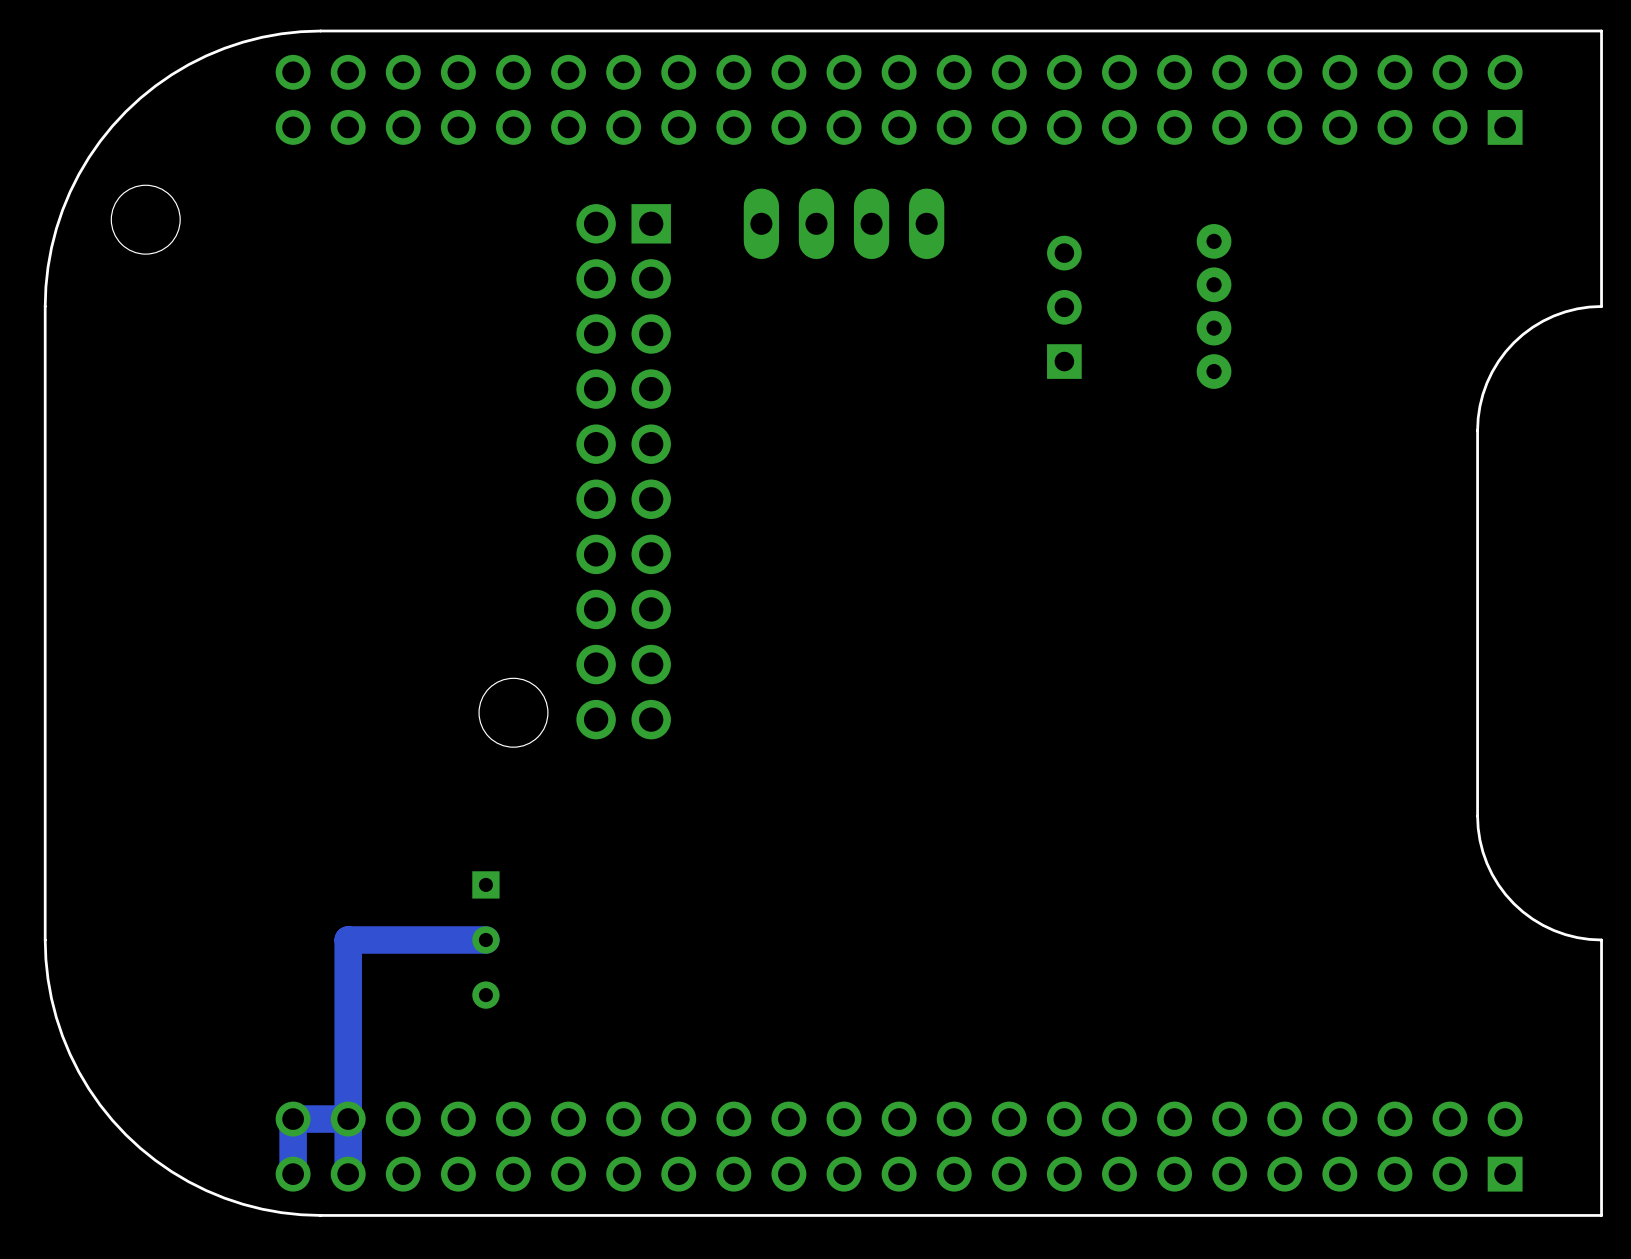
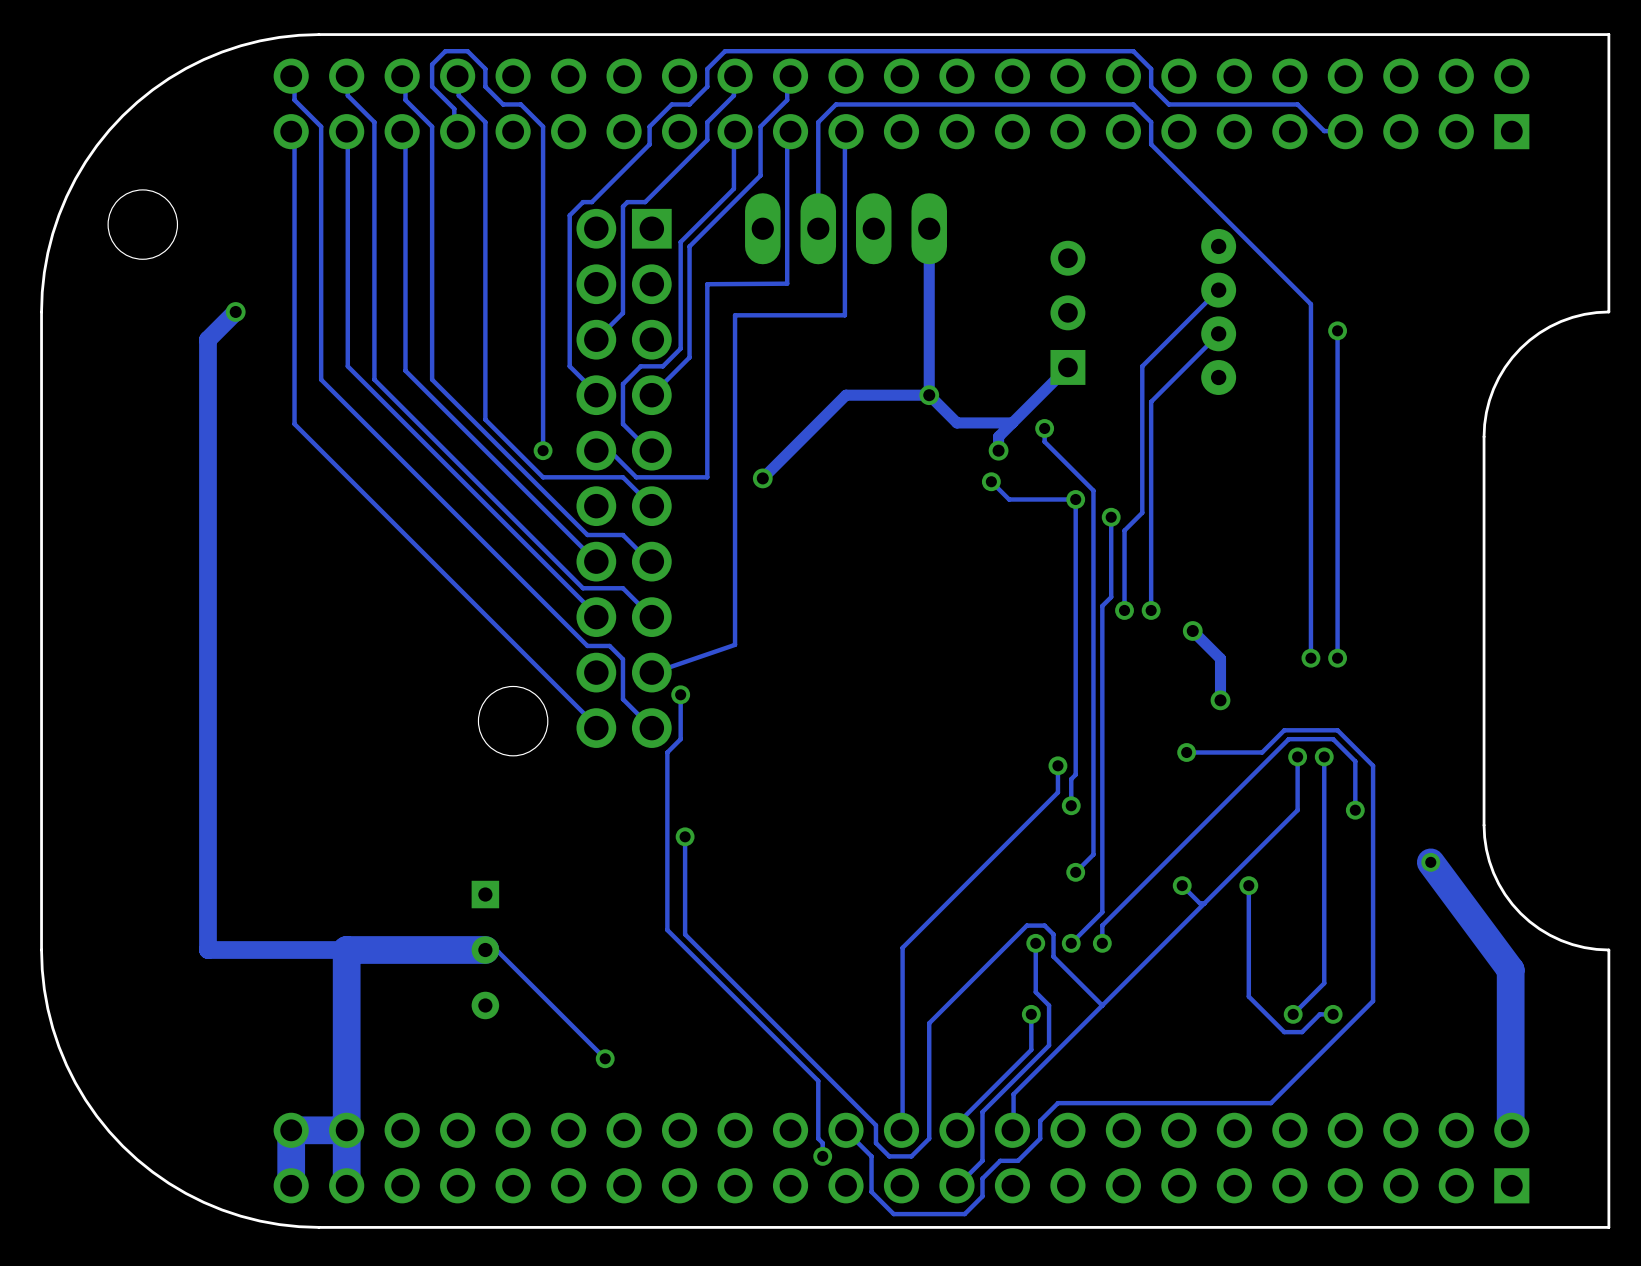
track: none -> (291, 76) (294, 77) (294, 100) (321, 126) (321, 379) (587, 645) (609, 645) (622, 659) (622, 699) (651, 728)
track: none -> (346, 76) (347, 95) (374, 122) (374, 379) (583, 588) (622, 588) (651, 617)
track: none -> (402, 76) (405, 77) (405, 100) (432, 126) (432, 379) (587, 535) (622, 535) (649, 561) (651, 561)
track: none -> (457, 76) (458, 95) (485, 122) (485, 419) (543, 477) (622, 477) (651, 506)
track: none -> (735, 76) (733, 95) (707, 122) (707, 139) (645, 202) (627, 202) (622, 206) (622, 313) (596, 339)
track: none -> (790, 76) (787, 77) (787, 100) (760, 126) (760, 175) (689, 246) (689, 357) (651, 395)
track: none -> (291, 131) (294, 135) (294, 424) (596, 725) (596, 728)
track: none -> (346, 131) (347, 366) (596, 614) (596, 617)
track: none -> (402, 131) (405, 135) (405, 370) (596, 561)
track: none -> (457, 131) (454, 131) (454, 108) (432, 86) (432, 64) (445, 51) (467, 51) (485, 68) (485, 86) (503, 104) (520, 104) (543, 126) (543, 450)
track: none -> (735, 131) (733, 188) (680, 242) (680, 348) (662, 366) (640, 366) (622, 384) (622, 424) (649, 450) (651, 450)
track: none -> (790, 131) (787, 135) (787, 283) (707, 284) (707, 477) (636, 477) (609, 450) (596, 450)
track: none -> (846, 131) (844, 315) (735, 315) (735, 644) (651, 672)
track: none -> (1345, 131) (1324, 131) (1297, 104) (1168, 104) (1151, 86) (1151, 68) (1133, 51) (725, 51) (707, 68) (707, 86) (689, 104) (671, 104) (649, 126) (649, 144) (591, 202) (583, 202) (569, 215) (569, 366) (596, 392) (596, 395)
track: none -> (818, 228) (818, 122) (836, 104) (1133, 104) (1151, 122) (1151, 144) (1310, 304) (1310, 658)
track: none -> (929, 228) (929, 395)
track: none -> (1218, 290) (1142, 366) (1142, 512) (1124, 530) (1124, 610)
track: none -> (235, 311) (207, 339) (207, 950) (346, 950)
via: none -> (235, 311)
track: none -> (1337, 330) (1337, 658)
via: none -> (1337, 330)
track: none -> (1218, 333) (1151, 401) (1151, 610)
track: none -> (1067, 367) (998, 436) (998, 450)
track: none -> (929, 395) (956, 422) (1012, 422)
track: none -> (929, 395) (846, 395) (762, 478)
via: none -> (929, 395)
track: none -> (1044, 428) (1044, 441) (1093, 490) (1093, 854) (1075, 872)
via: none -> (1044, 428)
via: none -> (543, 450)
via: none -> (998, 450)
via: none -> (762, 478)
track: none -> (991, 481) (1009, 499) (1075, 499) (1075, 774) (1071, 779) (1071, 805)
via: none -> (991, 481)
via: none -> (1075, 499)
track: none -> (1111, 517) (1111, 597) (1102, 606) (1102, 912) (1071, 943)
via: none -> (1111, 517)
via: none -> (1124, 610)
via: none -> (1151, 610)
track: none -> (1192, 630) (1220, 658) (1220, 700)
via: none -> (1192, 630)
via: none -> (1310, 658)
via: none -> (1337, 658)
track: none -> (680, 694) (680, 739) (667, 752) (667, 930) (818, 1080) (818, 1138) (822, 1143) (822, 1156)
via: none -> (680, 694)
via: none -> (1220, 700)
track: none -> (1186, 752) (1262, 752) (1284, 730) (1337, 730) (1373, 765) (1373, 1001) (1270, 1103) (1057, 1103) (1040, 1120) (1040, 1138) (1018, 1160) (1000, 1160) (982, 1178) (982, 1196) (964, 1214) (893, 1214) (871, 1191) (871, 1156) (846, 1130)
via: none -> (1186, 752)
track: none -> (1297, 756) (1297, 810) (1013, 1094) (1012, 1130)
via: none -> (1297, 756)
track: none -> (1324, 756) (1324, 983) (1293, 1014)
via: none -> (1324, 756)
track: none -> (1057, 765) (1057, 792) (902, 947) (901, 1130)
via: none -> (1057, 765)
via: none -> (1071, 805)
track: none -> (1355, 810) (1355, 761) (1333, 739) (1288, 739) (1102, 925) (1102, 943)
via: none -> (1355, 810)
track: none -> (685, 836) (685, 934) (875, 1125) (875, 1143) (889, 1156) (911, 1156) (929, 1138) (929, 1023) (1026, 925) (1044, 925) (1053, 934) (1053, 956) (1102, 1005)
via: none -> (685, 836)
track: none -> (1430, 862) (1510, 969) (1511, 1130)
via: none -> (1430, 862)
via: none -> (1075, 872)
track: none -> (1182, 885) (1199, 903) (1204, 903)
via: none -> (1182, 885)
track: none -> (1248, 885) (1248, 996) (1284, 1032) (1302, 1032) (1319, 1014) (1333, 1014)
via: none -> (1248, 885)
track: none -> (1035, 943) (1035, 992) (1049, 1005) (1049, 1045) (982, 1112) (982, 1160) (956, 1185)
via: none -> (1035, 943)
via: none -> (1071, 943)
via: none -> (1102, 943)
track: none -> (485, 950) (498, 952) (605, 1058)
track: none -> (1031, 1014) (1031, 1049) (960, 1120) (960, 1129) (956, 1130)
via: none -> (1031, 1014)
via: none -> (1293, 1014)
via: none -> (1333, 1014)
via: none -> (605, 1058)
via: none -> (822, 1156)

